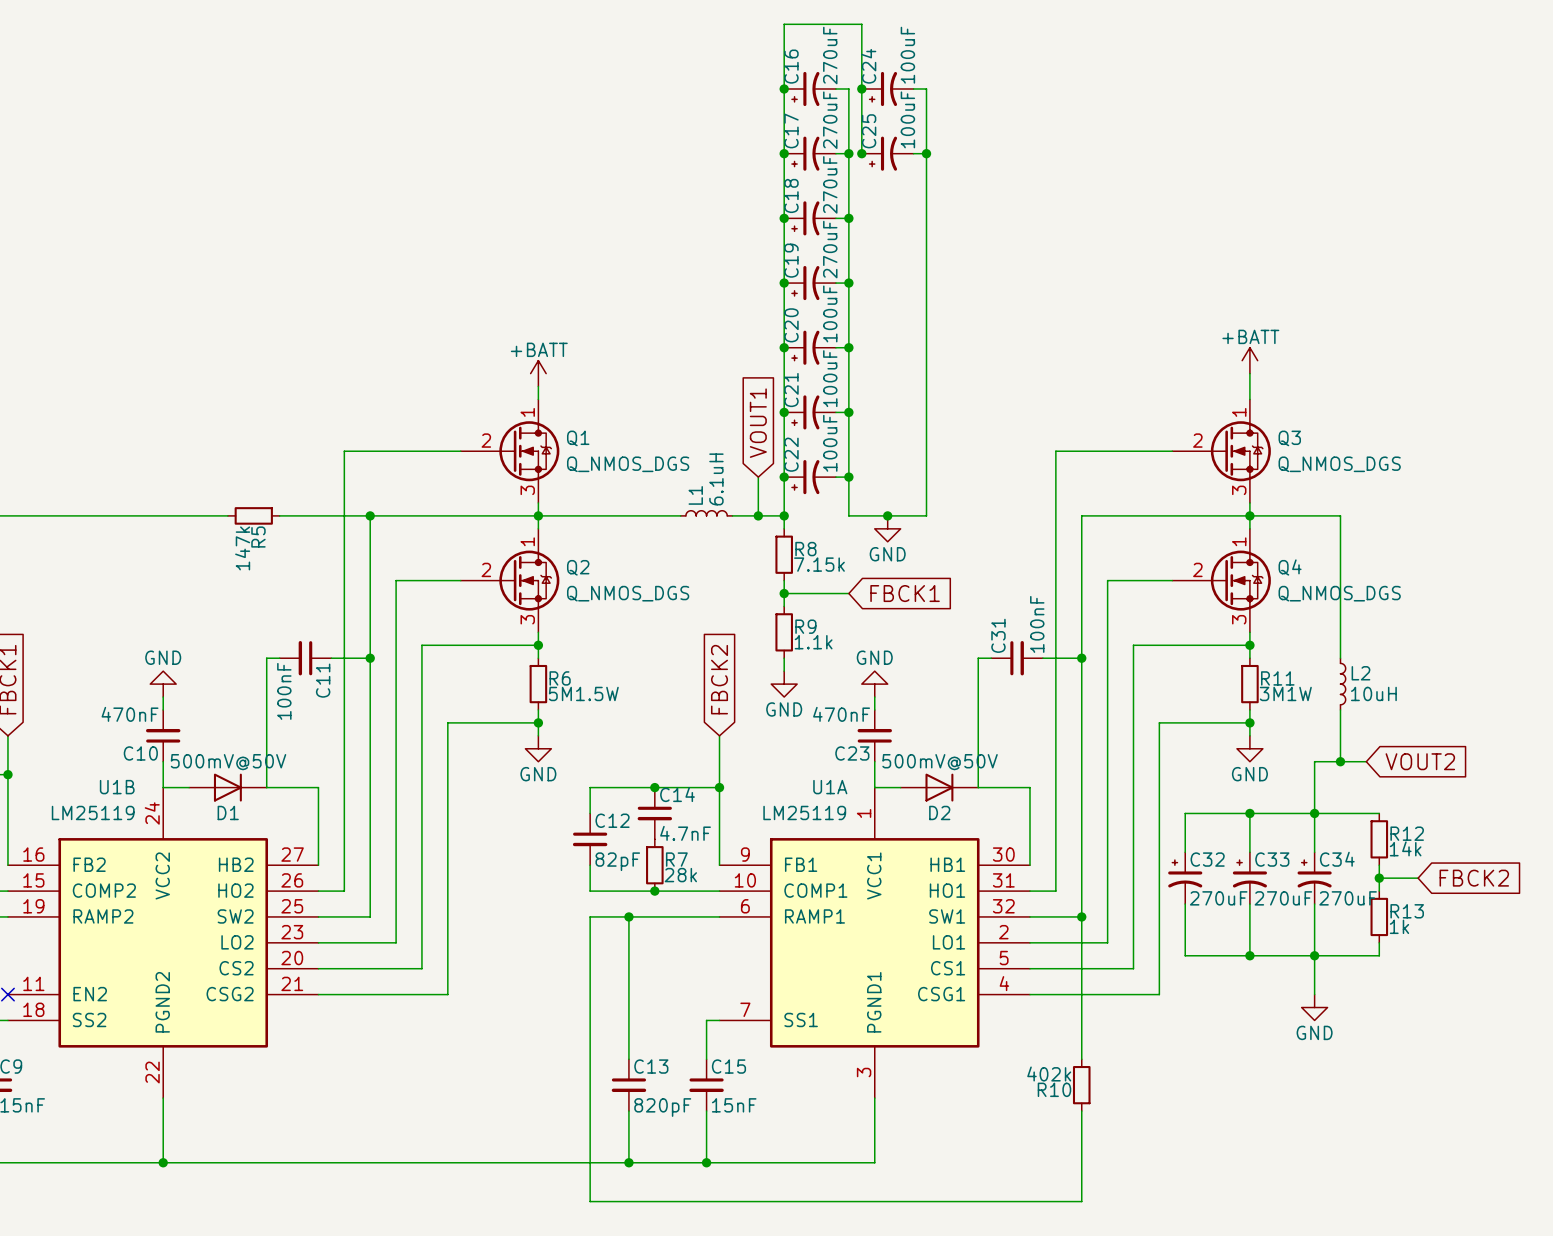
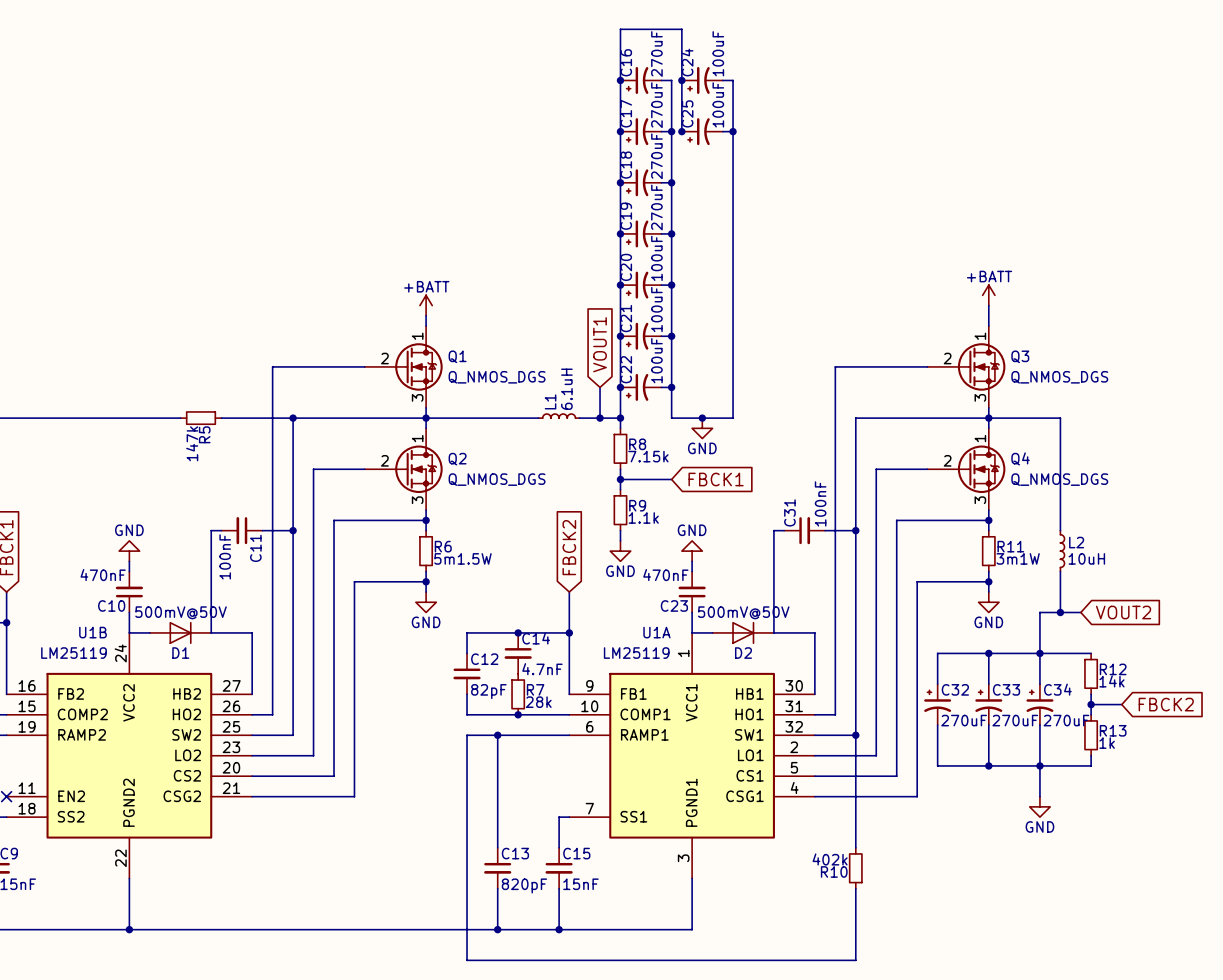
R6 value: 5M1.5W (583, 693) -> 5m1.5W (463, 558)
R11 value: 3M1W (1285, 693) -> 3m1W (1018, 558)

